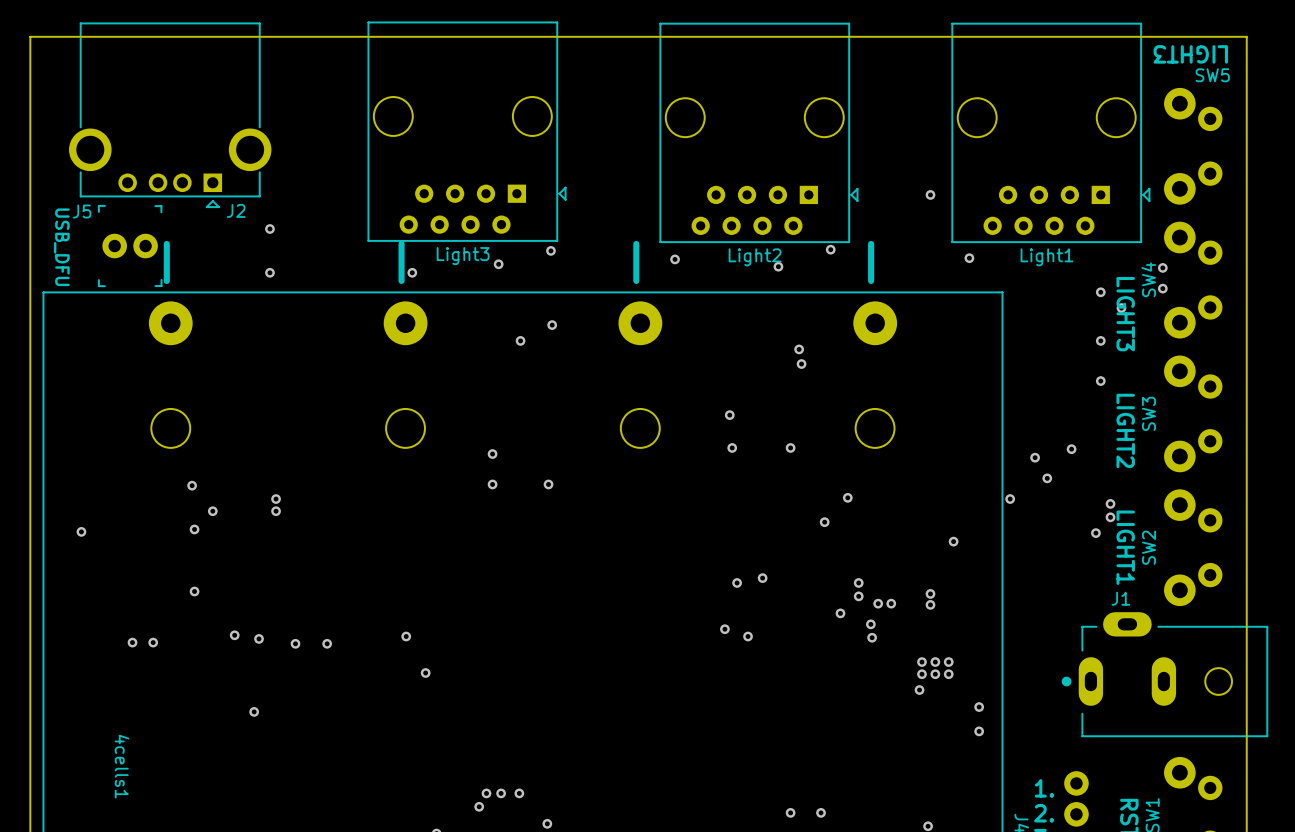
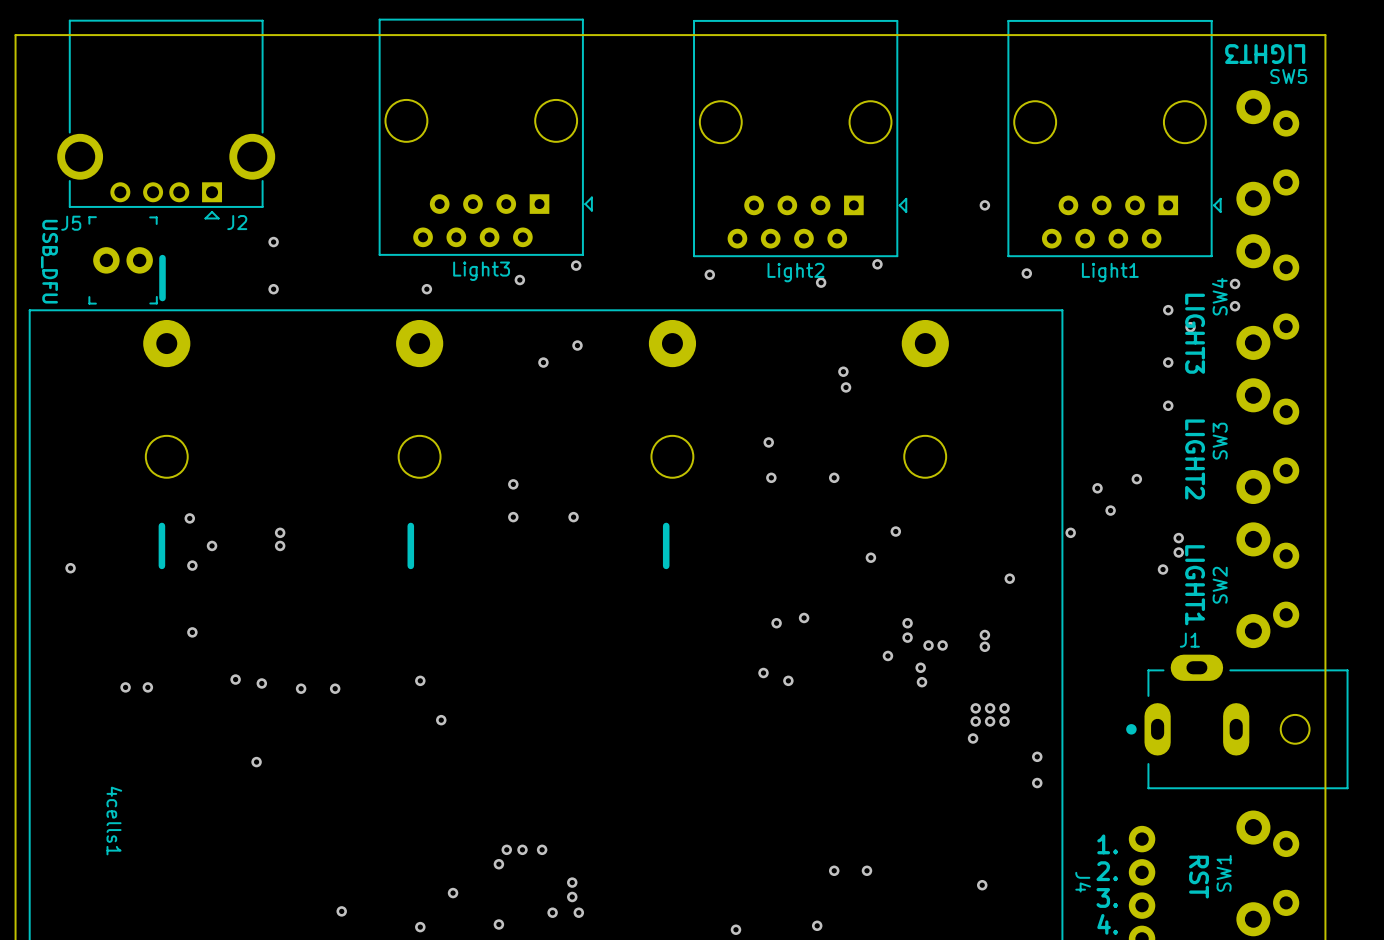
4cells1 text position: - (401, 262) -> - (161, 545)
4cells1 text position: - (636, 262) -> - (410, 545)
4cells1 text position: - (871, 262) -> - (666, 545)

